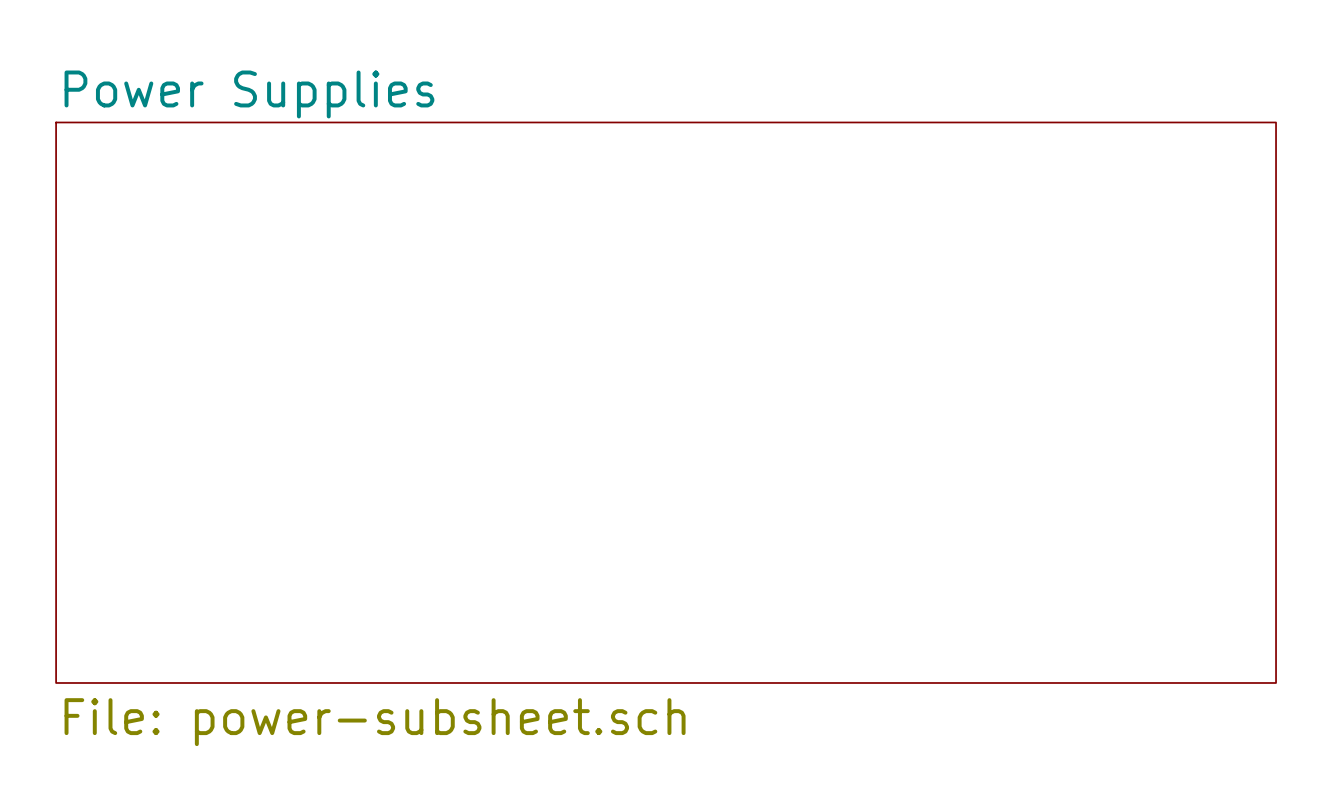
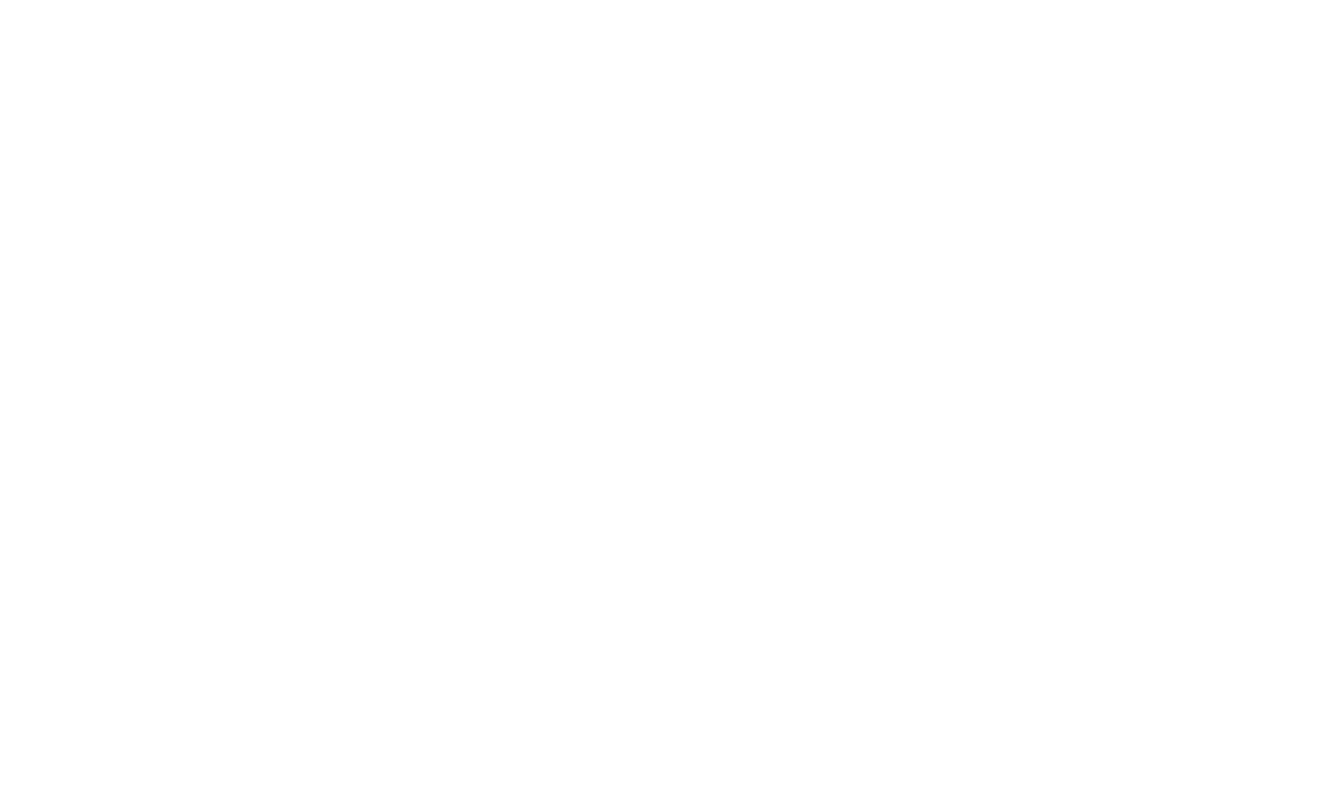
sheet Power Supplies: File: power-subsheet.sch (666, 402) -> none

